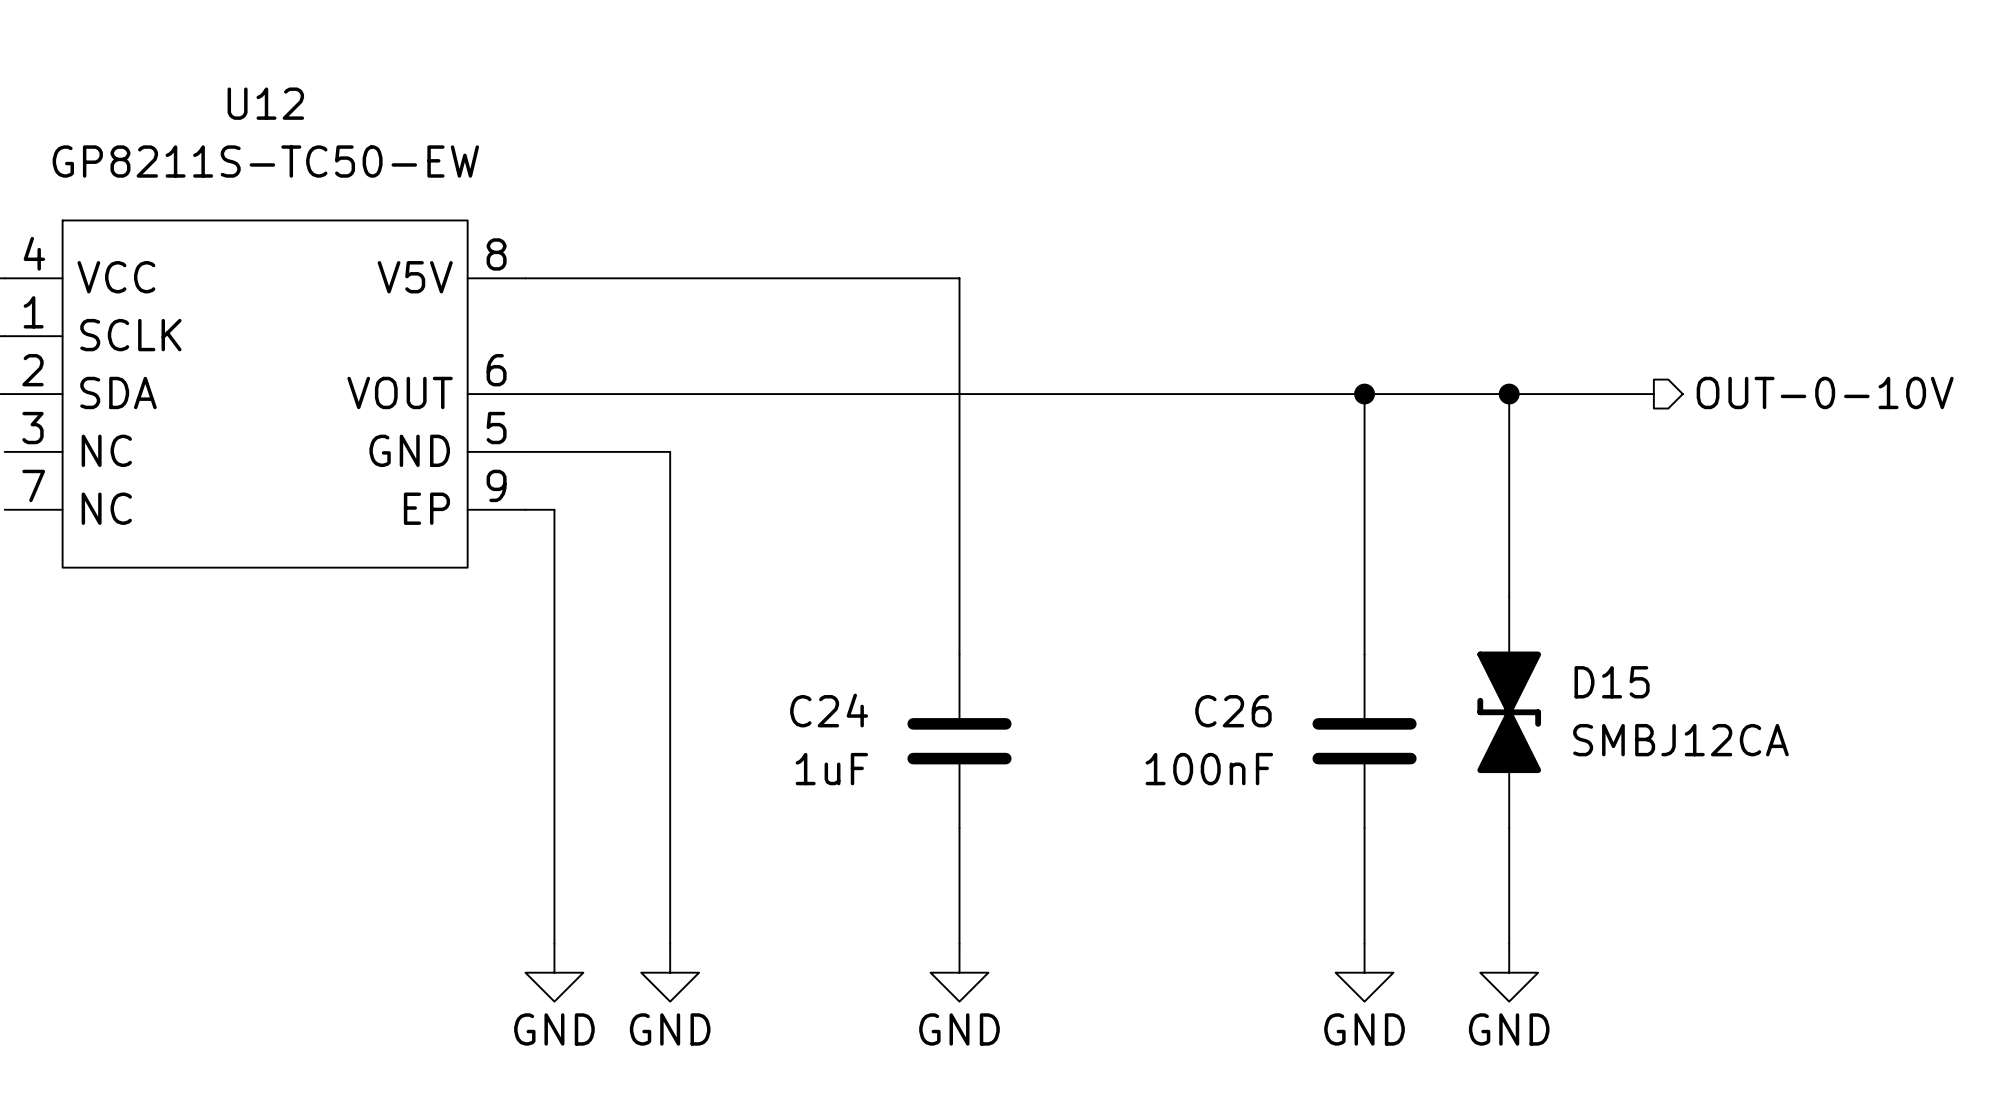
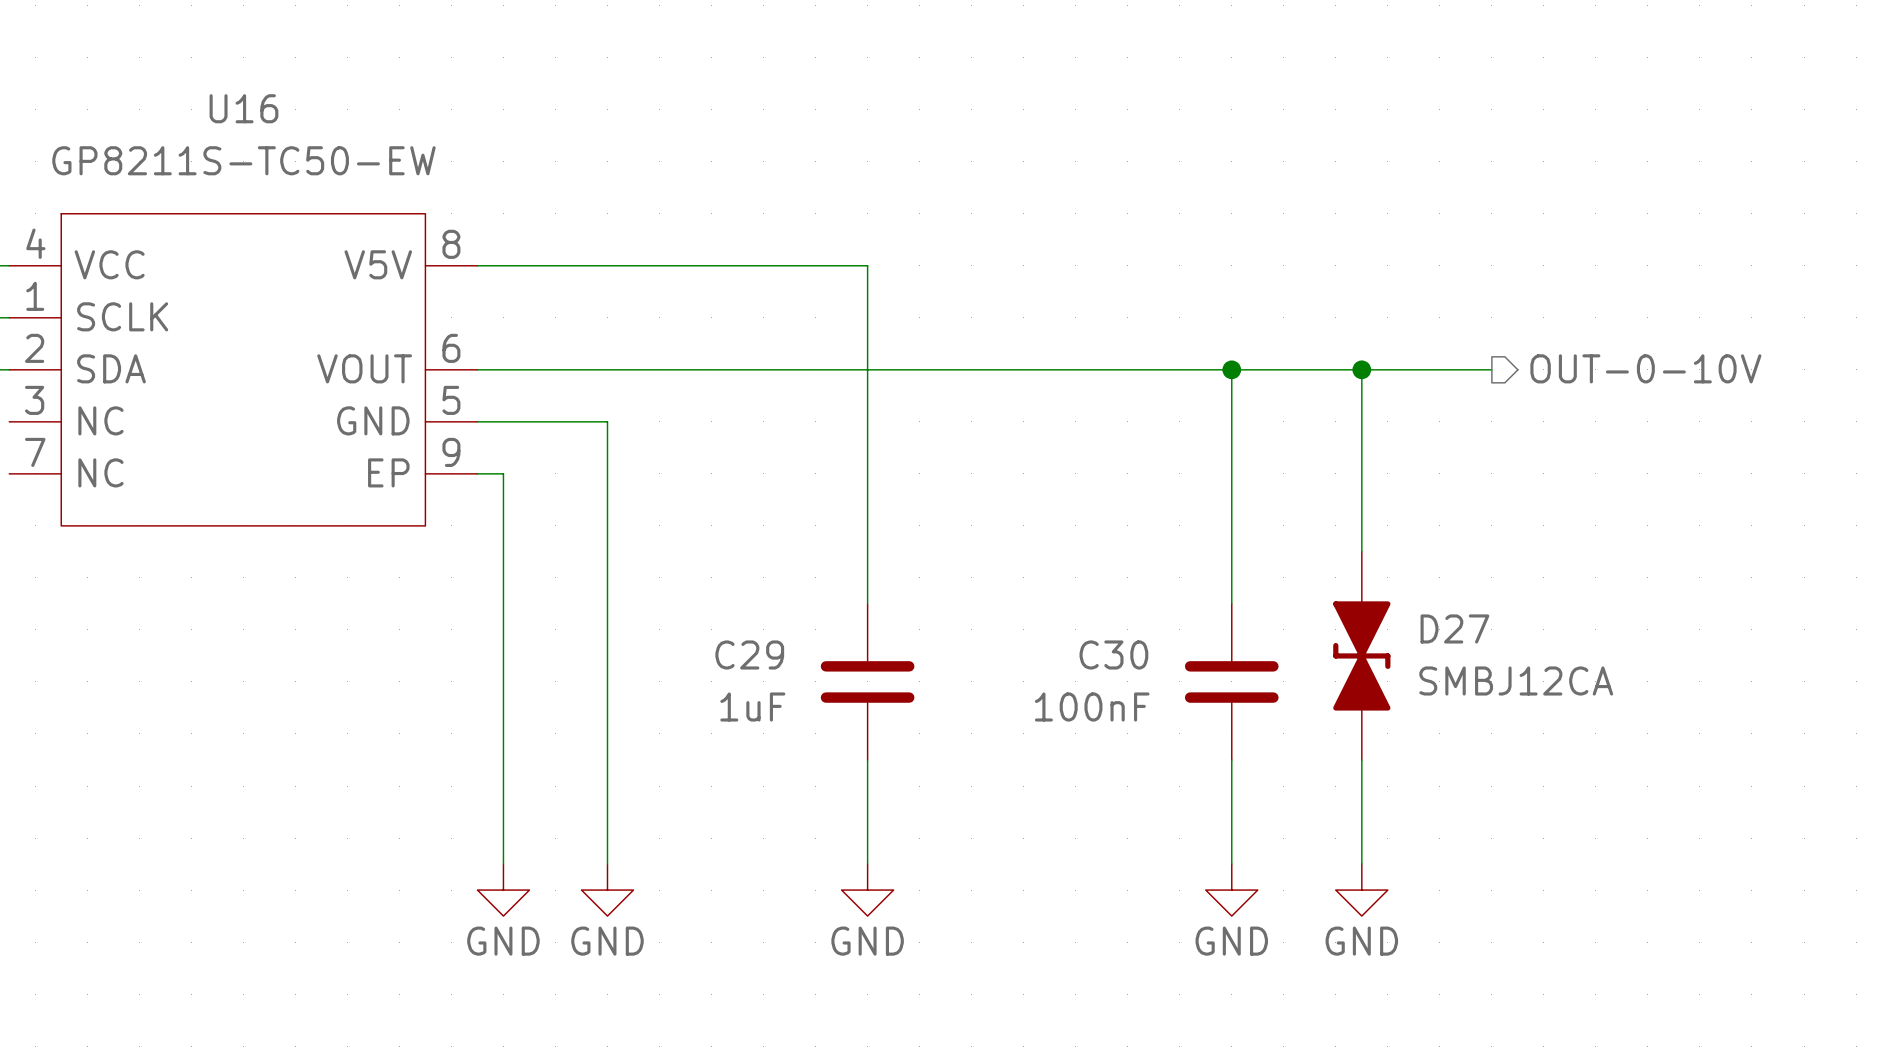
U12 name: U12 (265, 103) -> U16 (243, 108)
D15 name: D15 (1612, 682) -> D27 (1454, 628)
C24 name: C24 (829, 710) -> C29 (749, 654)
C26 name: C26 (1233, 711) -> C30 (1113, 654)

